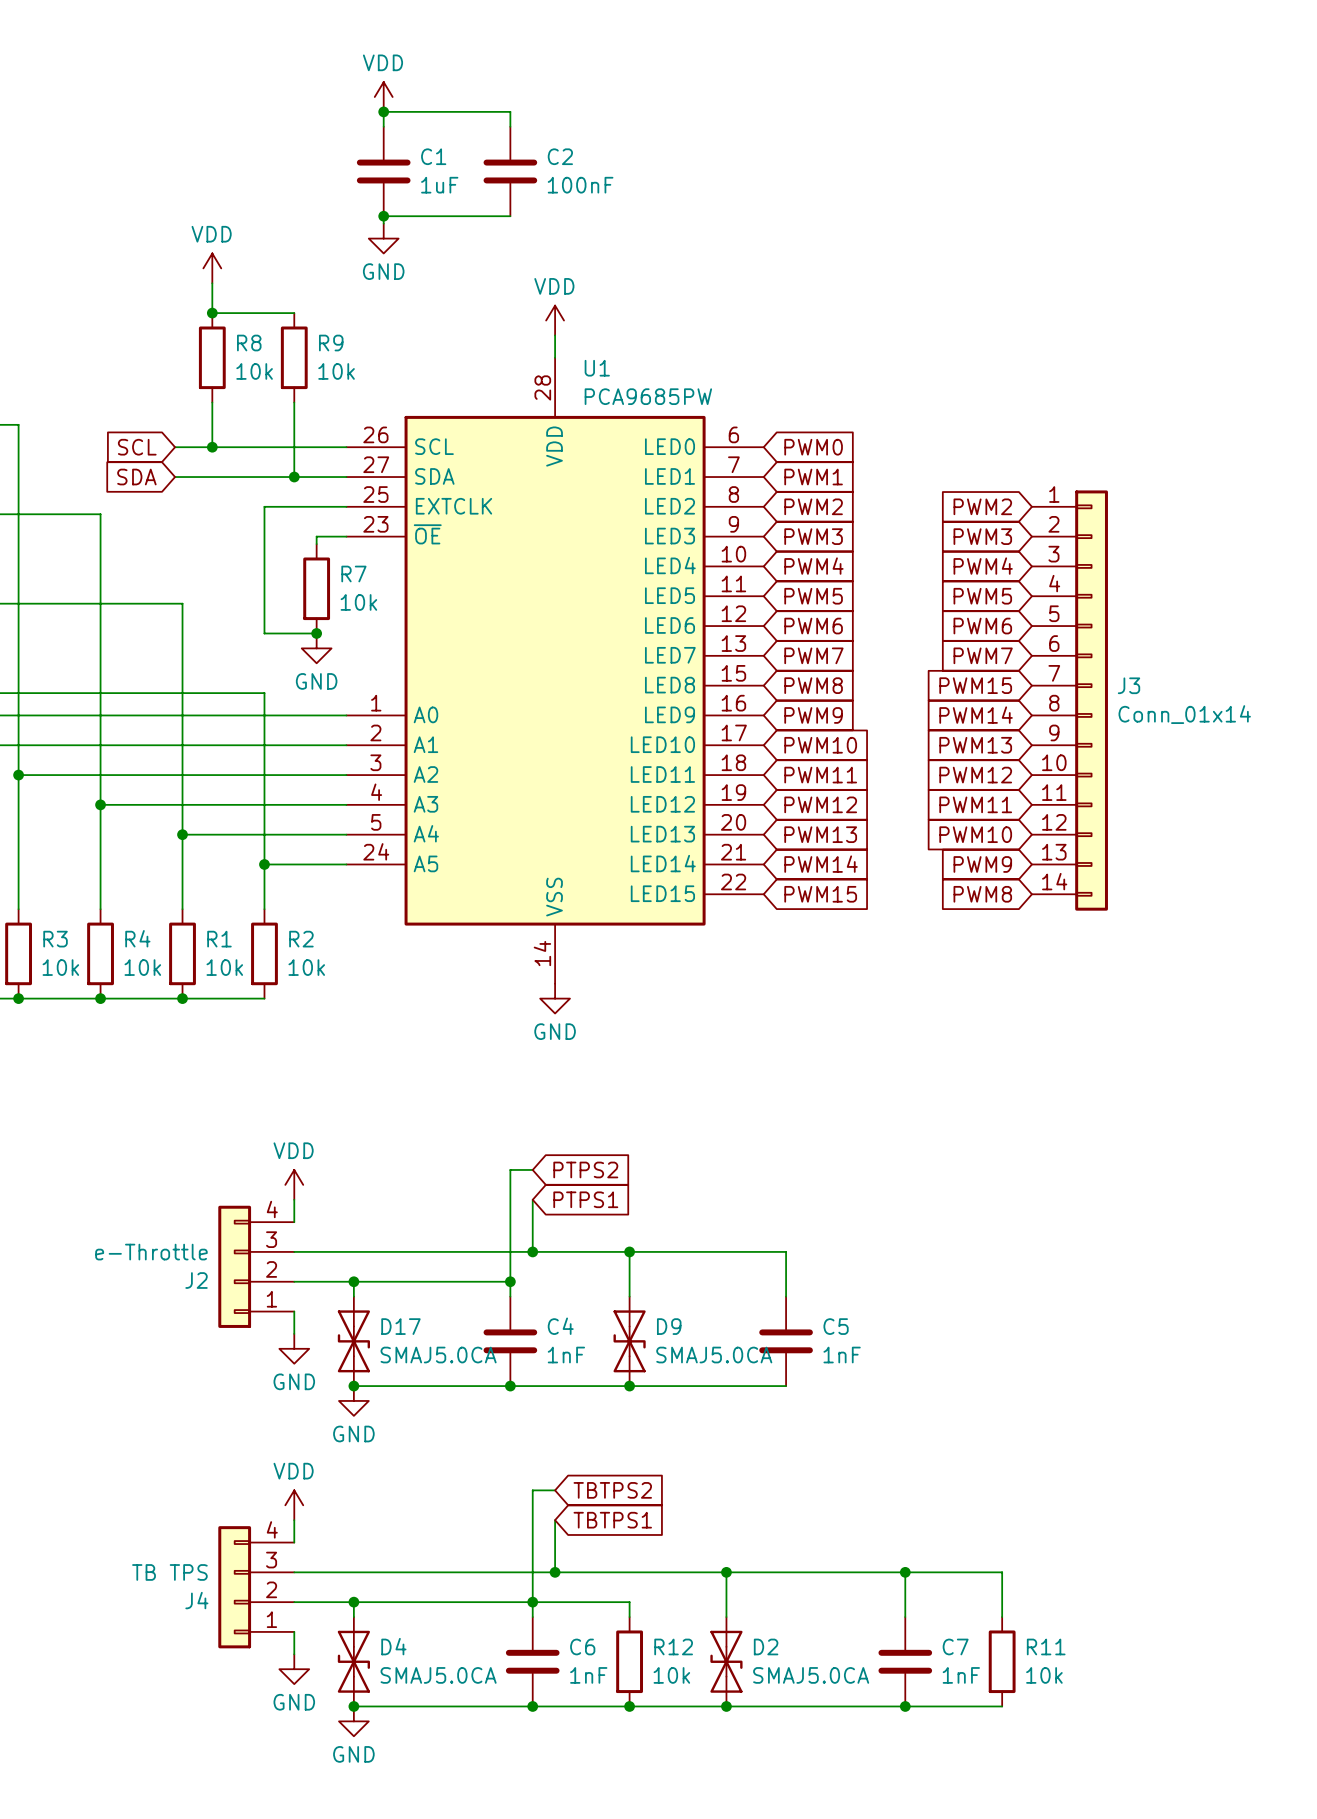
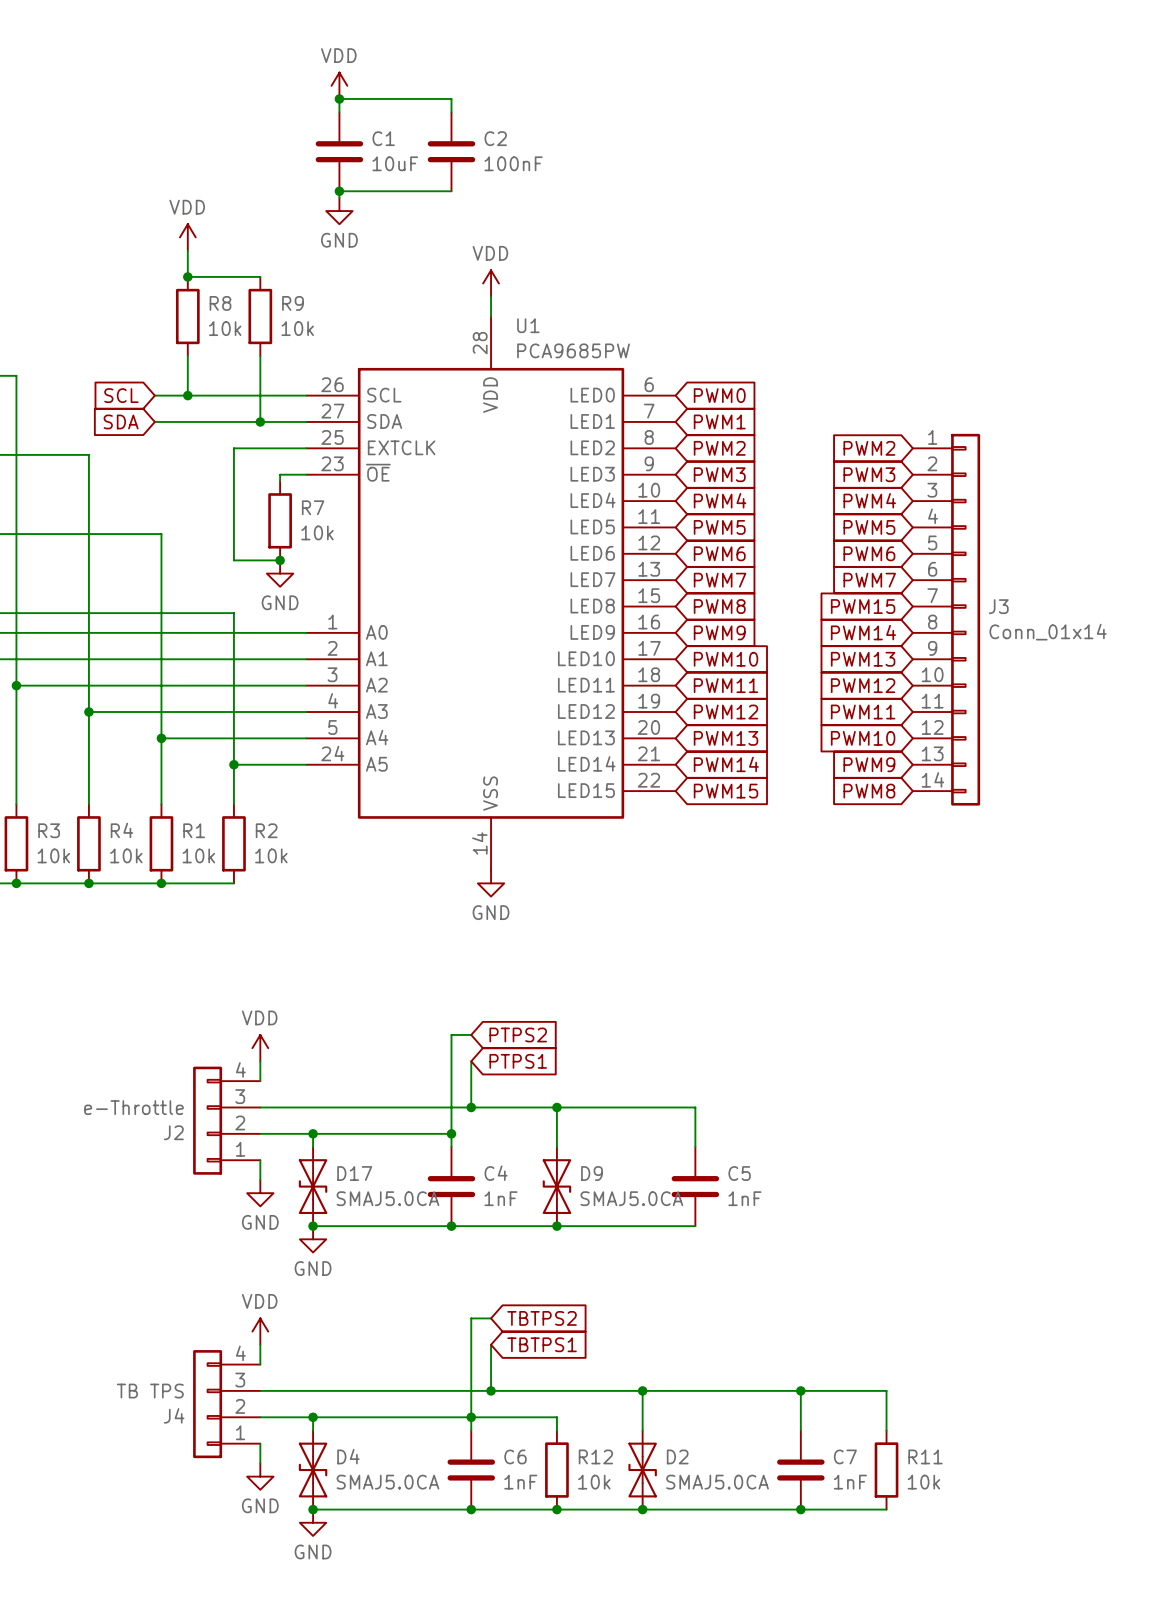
C1 value: 1uF (439, 185) -> 10uF (395, 163)

